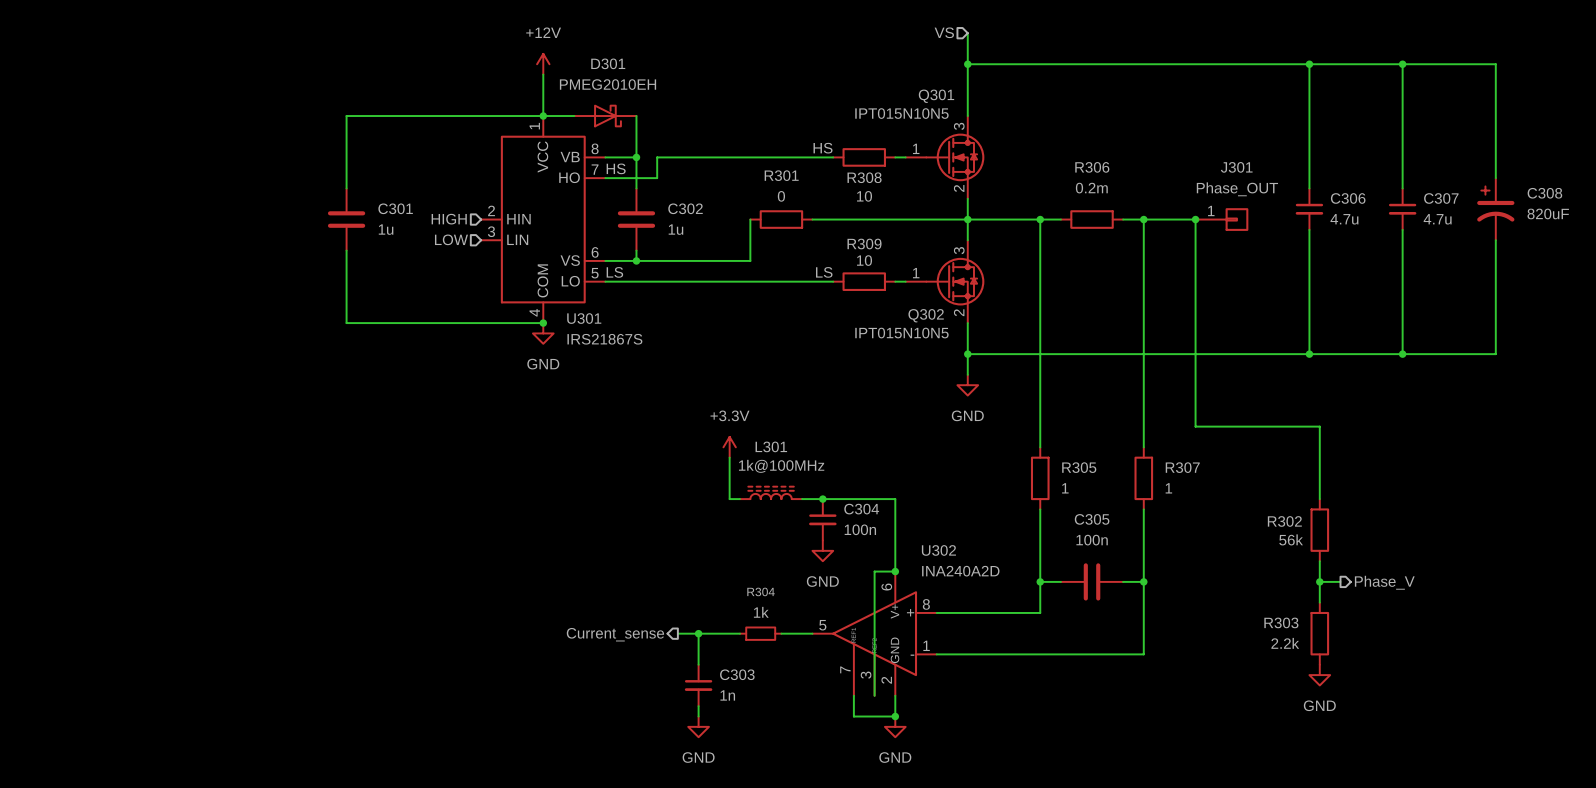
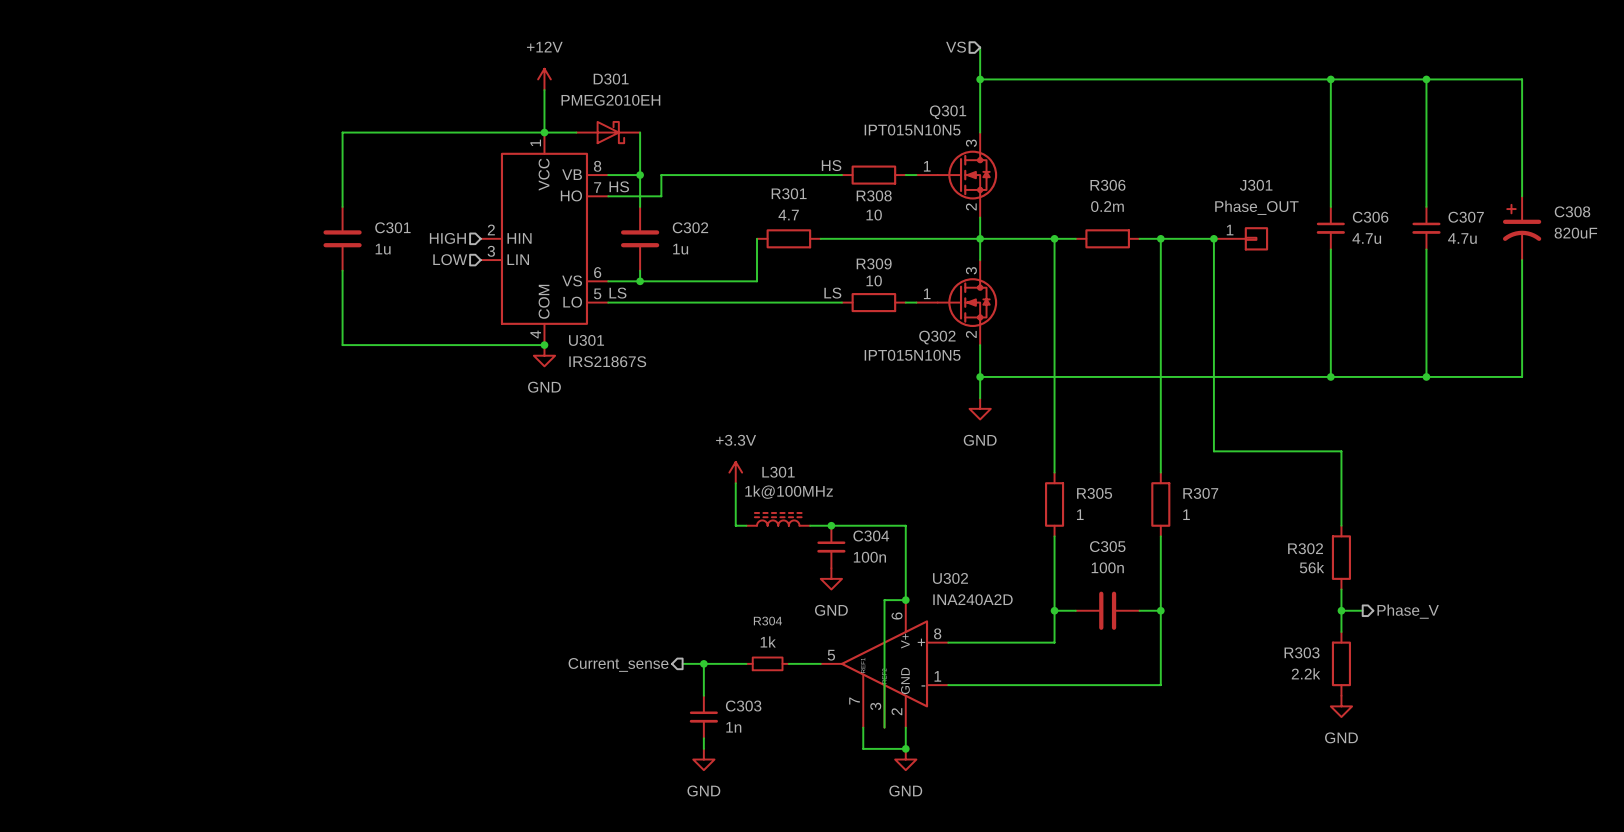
R301 value: 0 (781, 196) -> 4.7 (788, 215)

